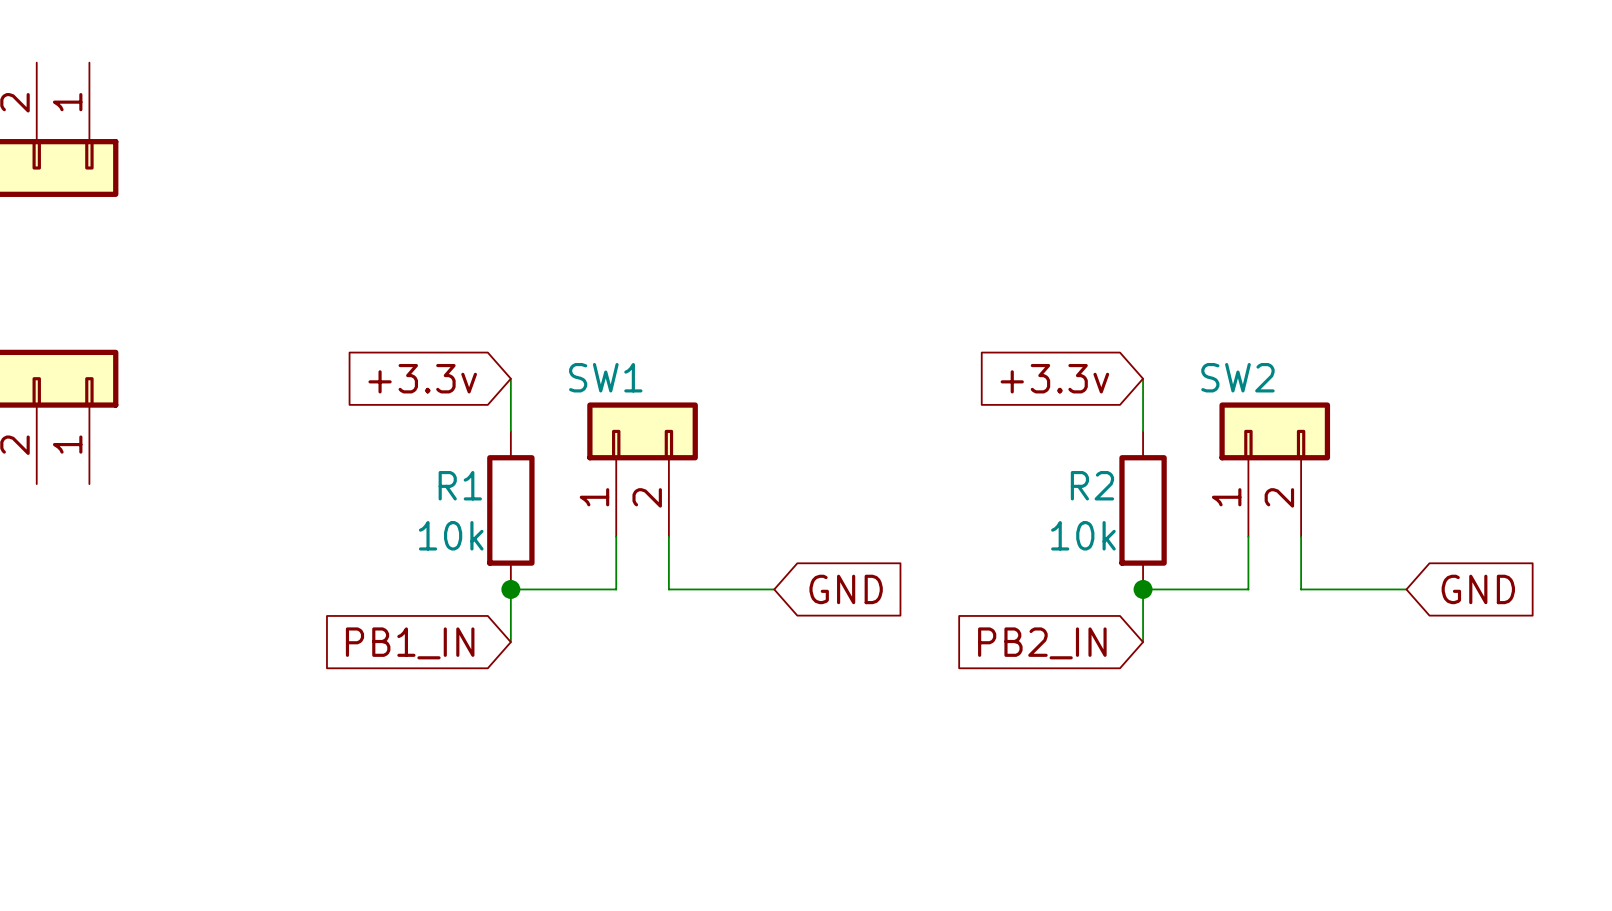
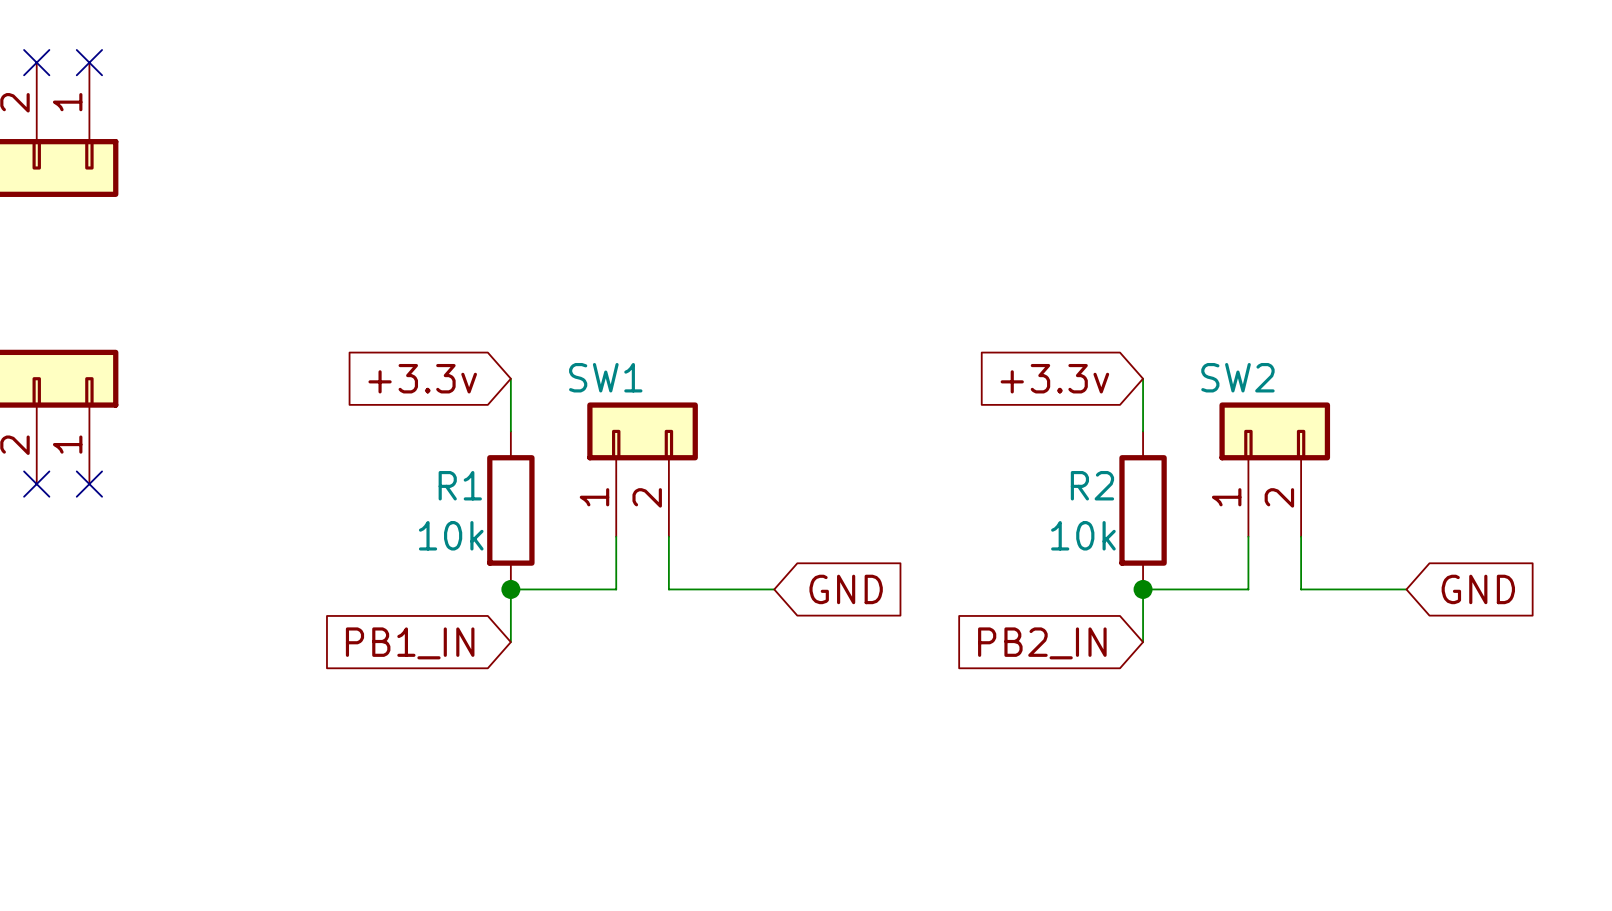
no-connect mark: none -> (36, 62)
no-connect mark: none -> (89, 62)
no-connect mark: none -> (36, 484)
no-connect mark: none -> (89, 484)

